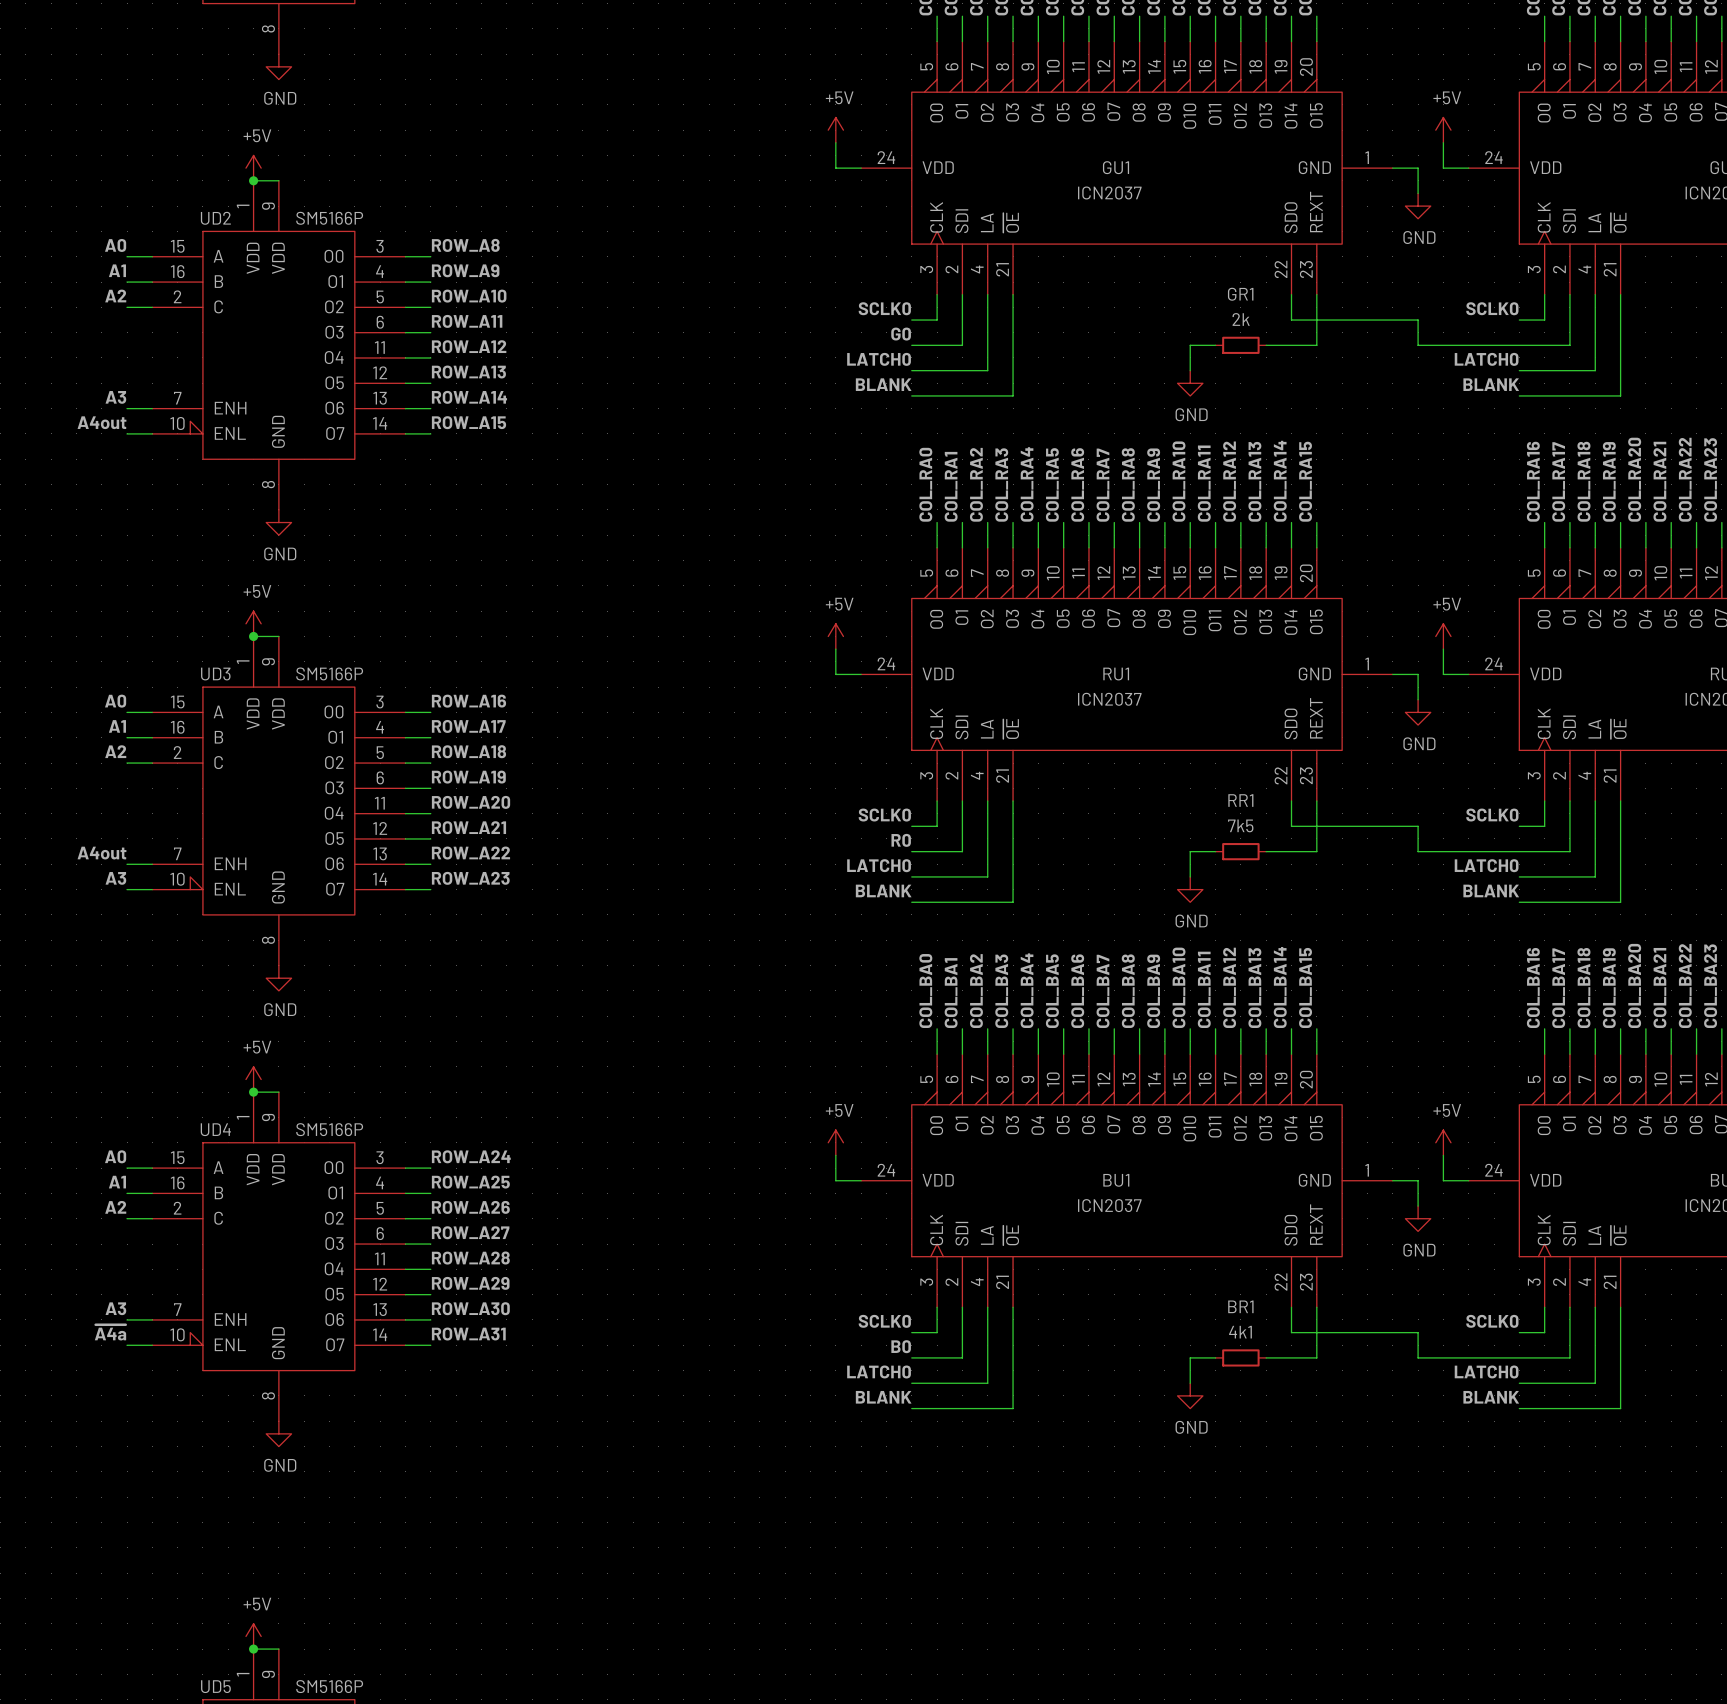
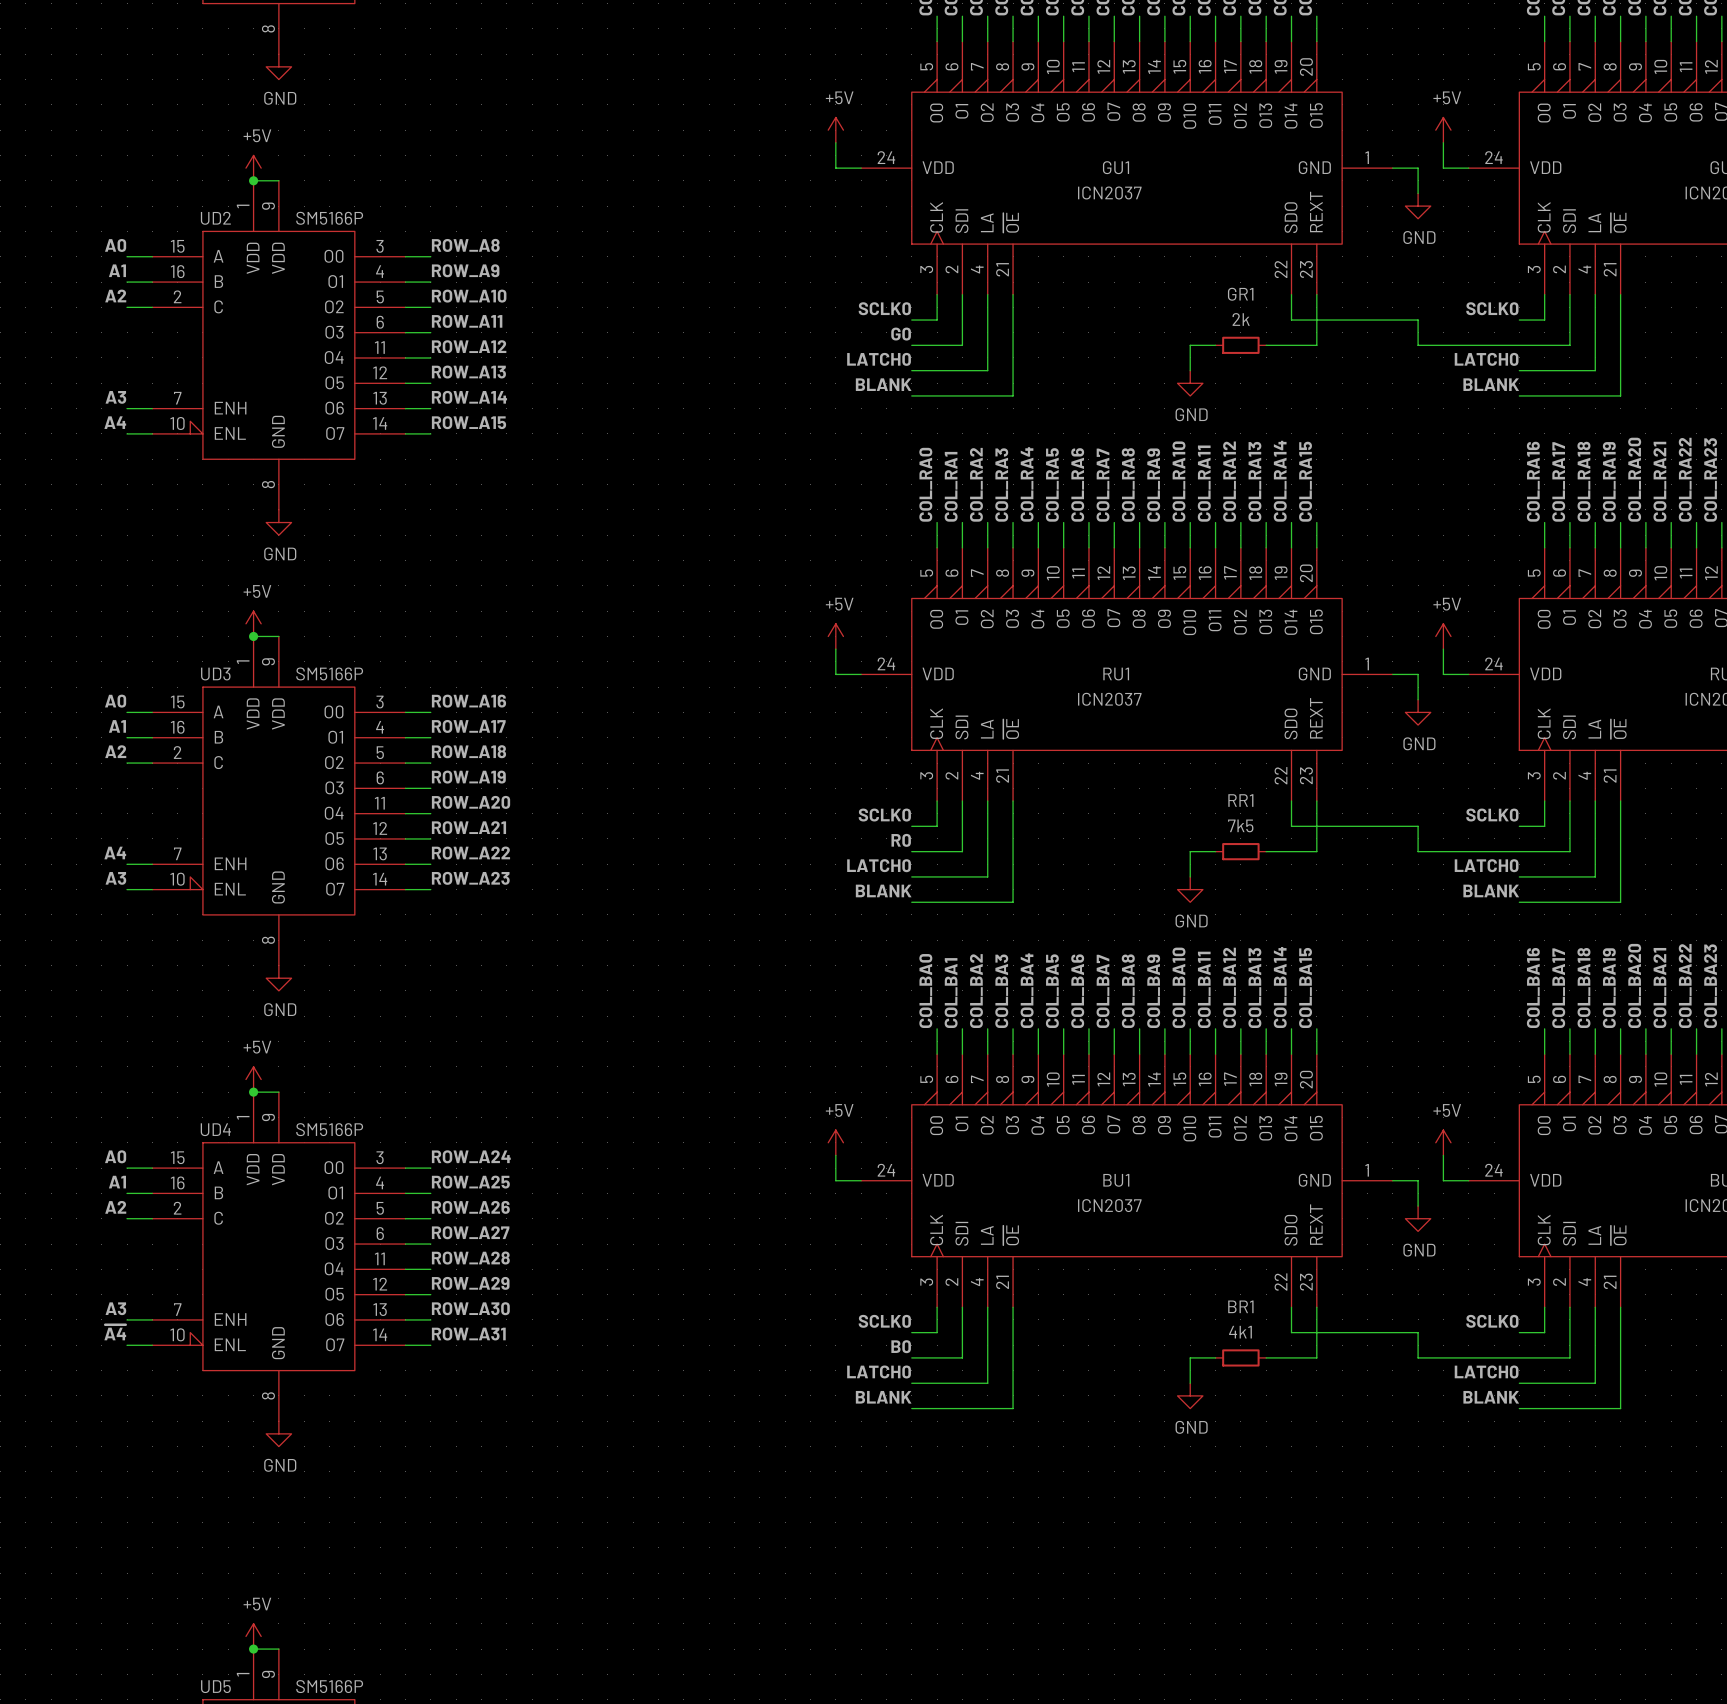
label: A4out (102, 422) -> A4 (115, 422)
label: A4out (102, 853) -> A4 (115, 853)
label: ~{A4a} (110, 1332) -> ~{A4} (115, 1332)

